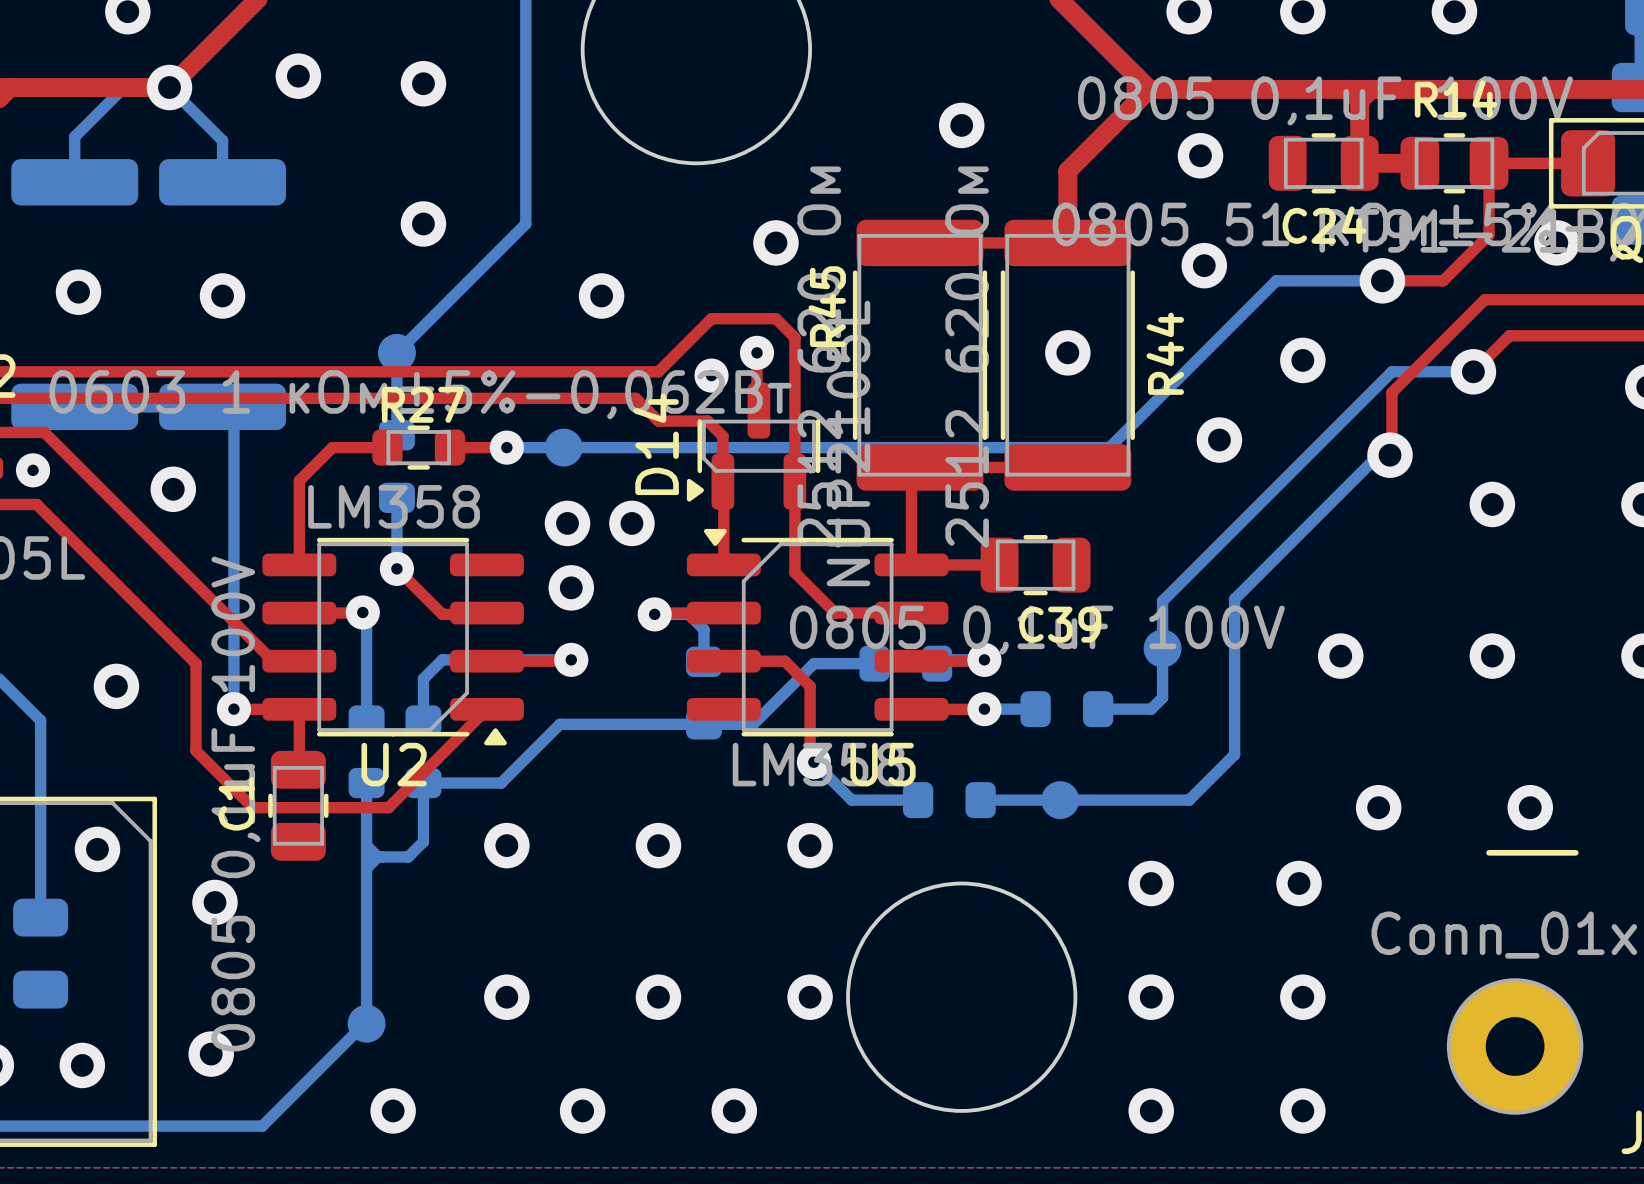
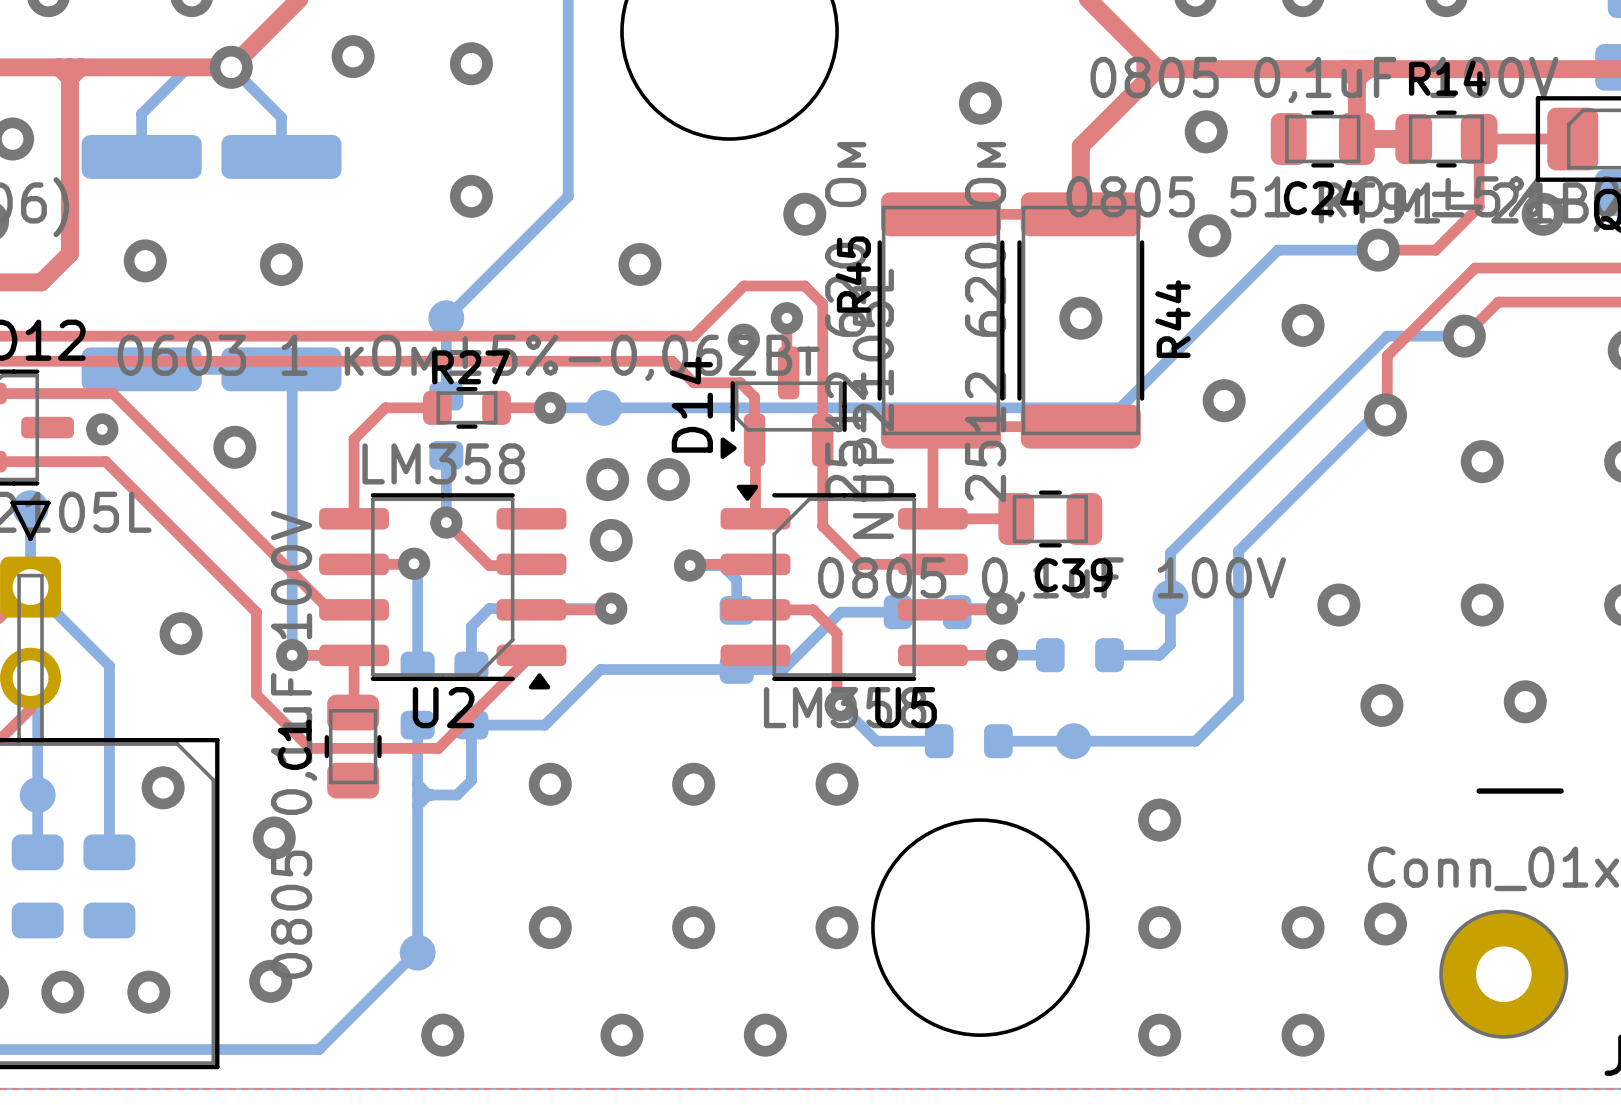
via position: (1378, 807) -> (1381, 705)
via position: (1530, 807) -> (1525, 701)
via: (1299, 883) -> none
via: none -> (1385, 924)

